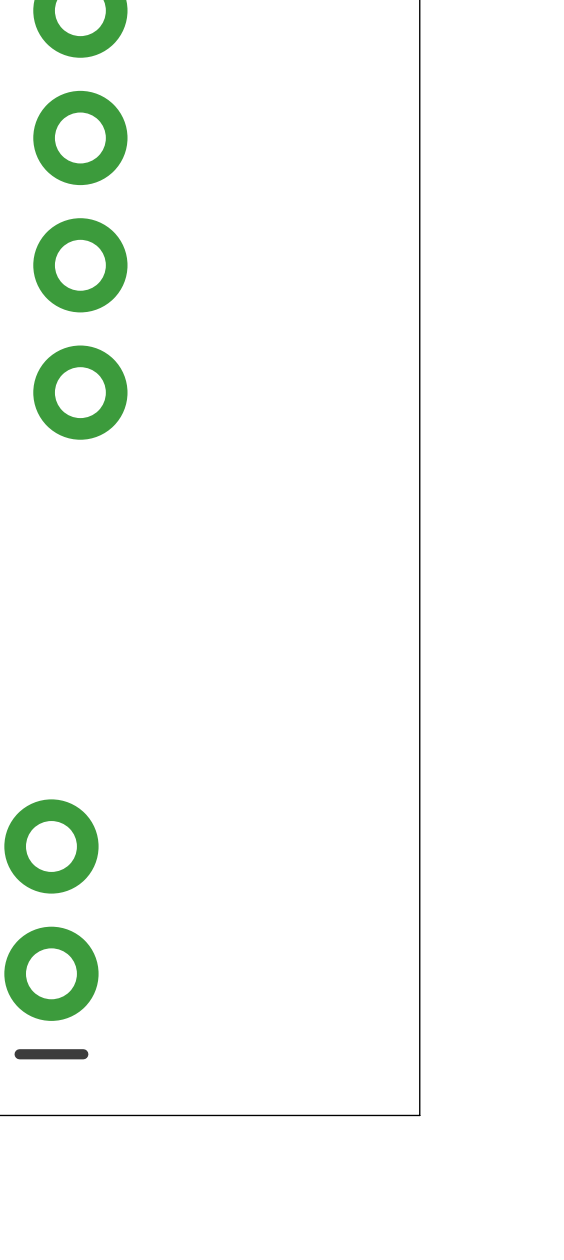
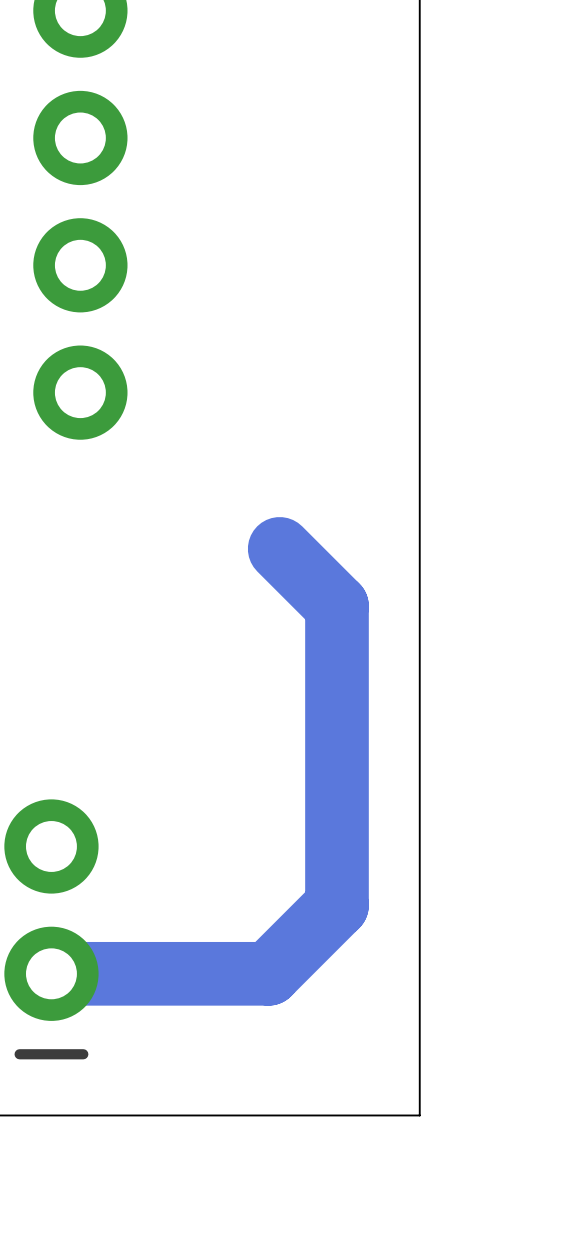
track: none -> (279, 548) (336, 606) (336, 905) (268, 973) (51, 973)

